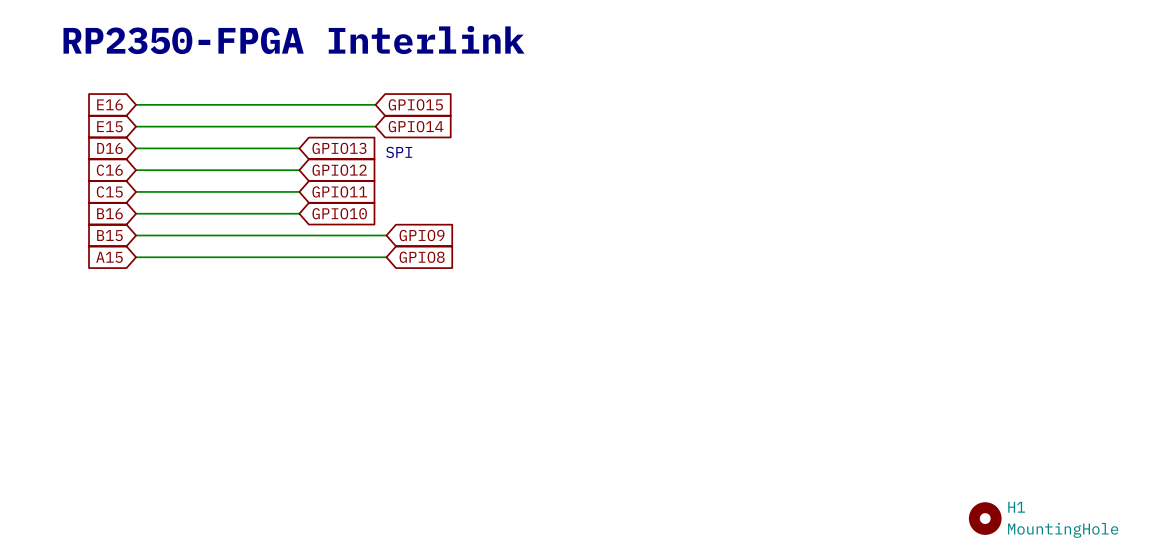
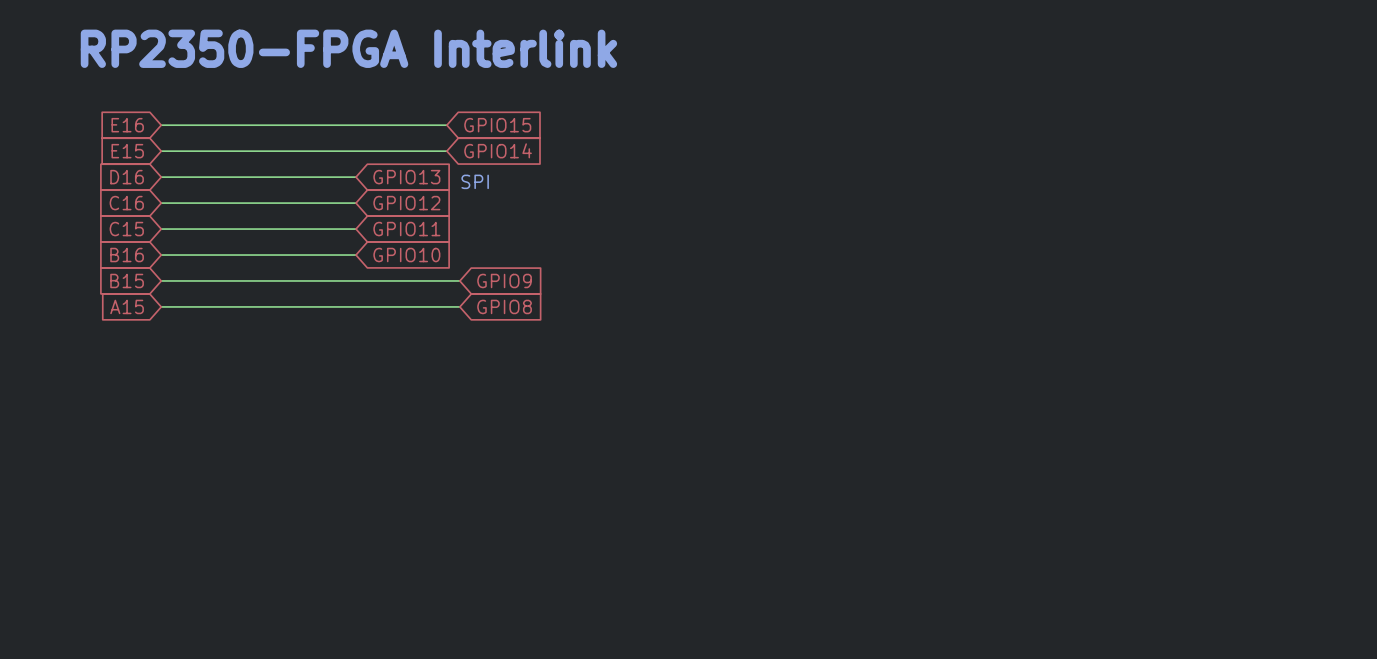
H1: MountingHole (985, 518) -> none

